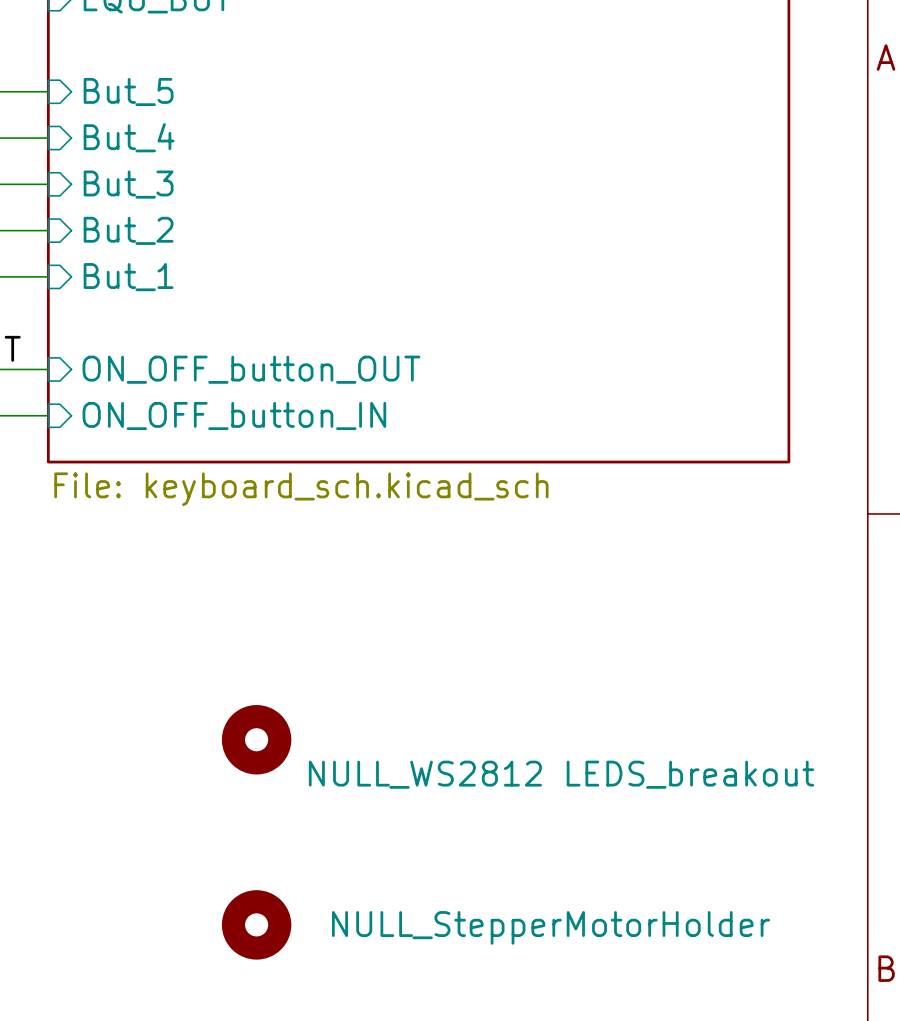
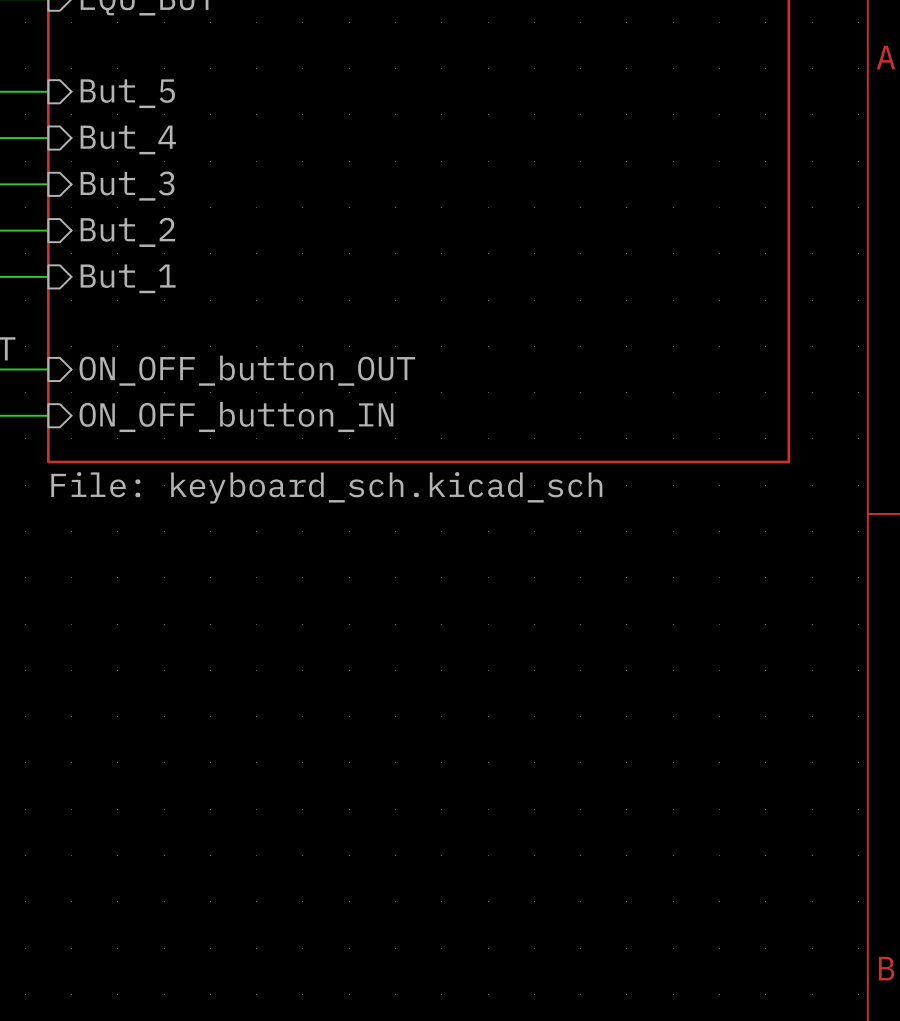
part: NULL_WS2812 LEDS_breakout (256, 739) -> none
part: NULL_StepperMotorHolder (256, 924) -> none

